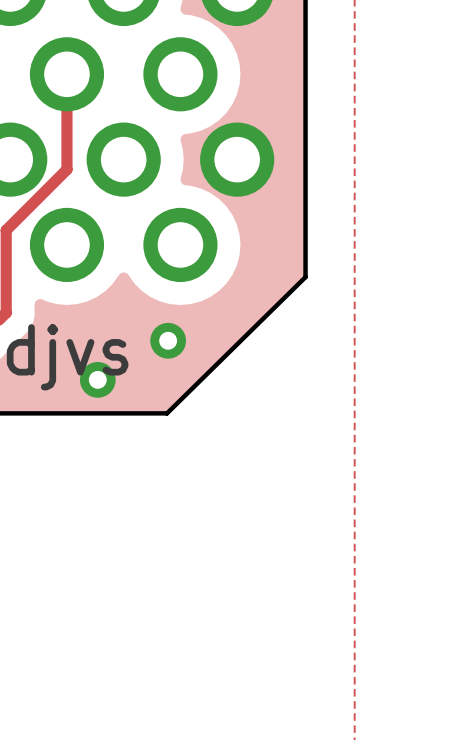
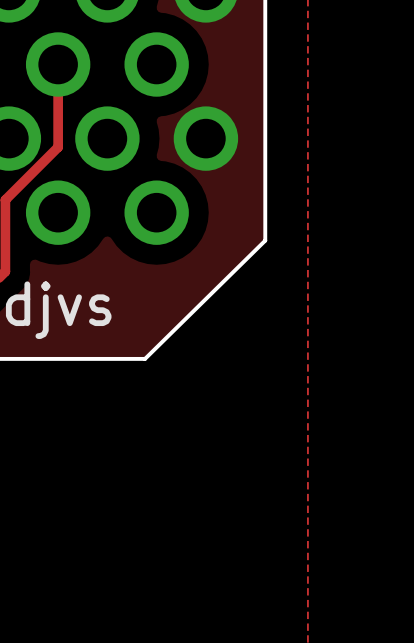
via: (168, 340) -> none
via: (97, 379) -> none

